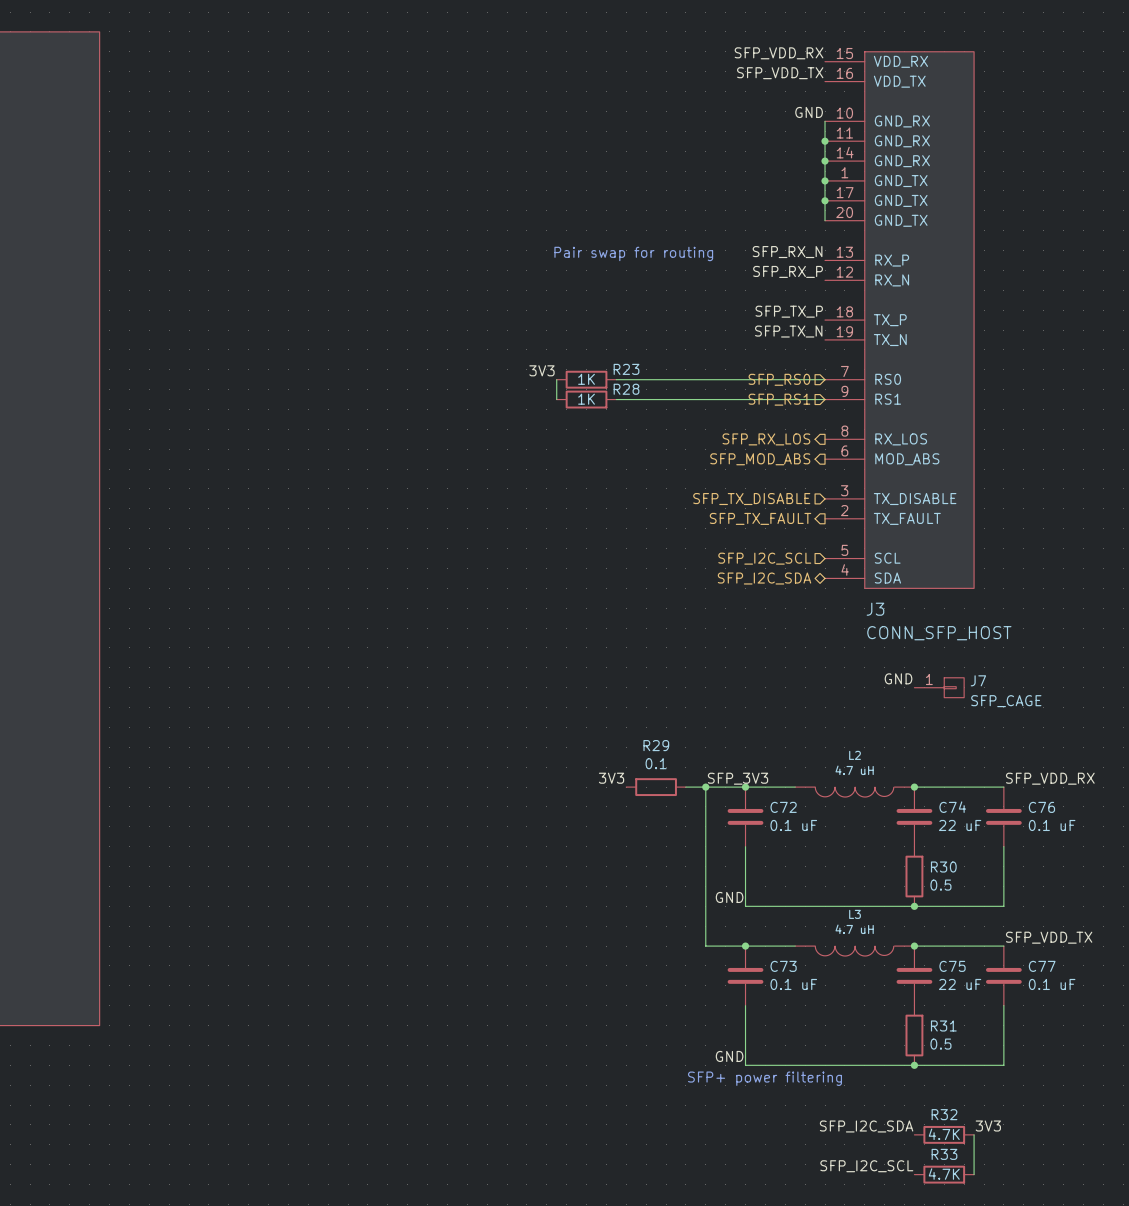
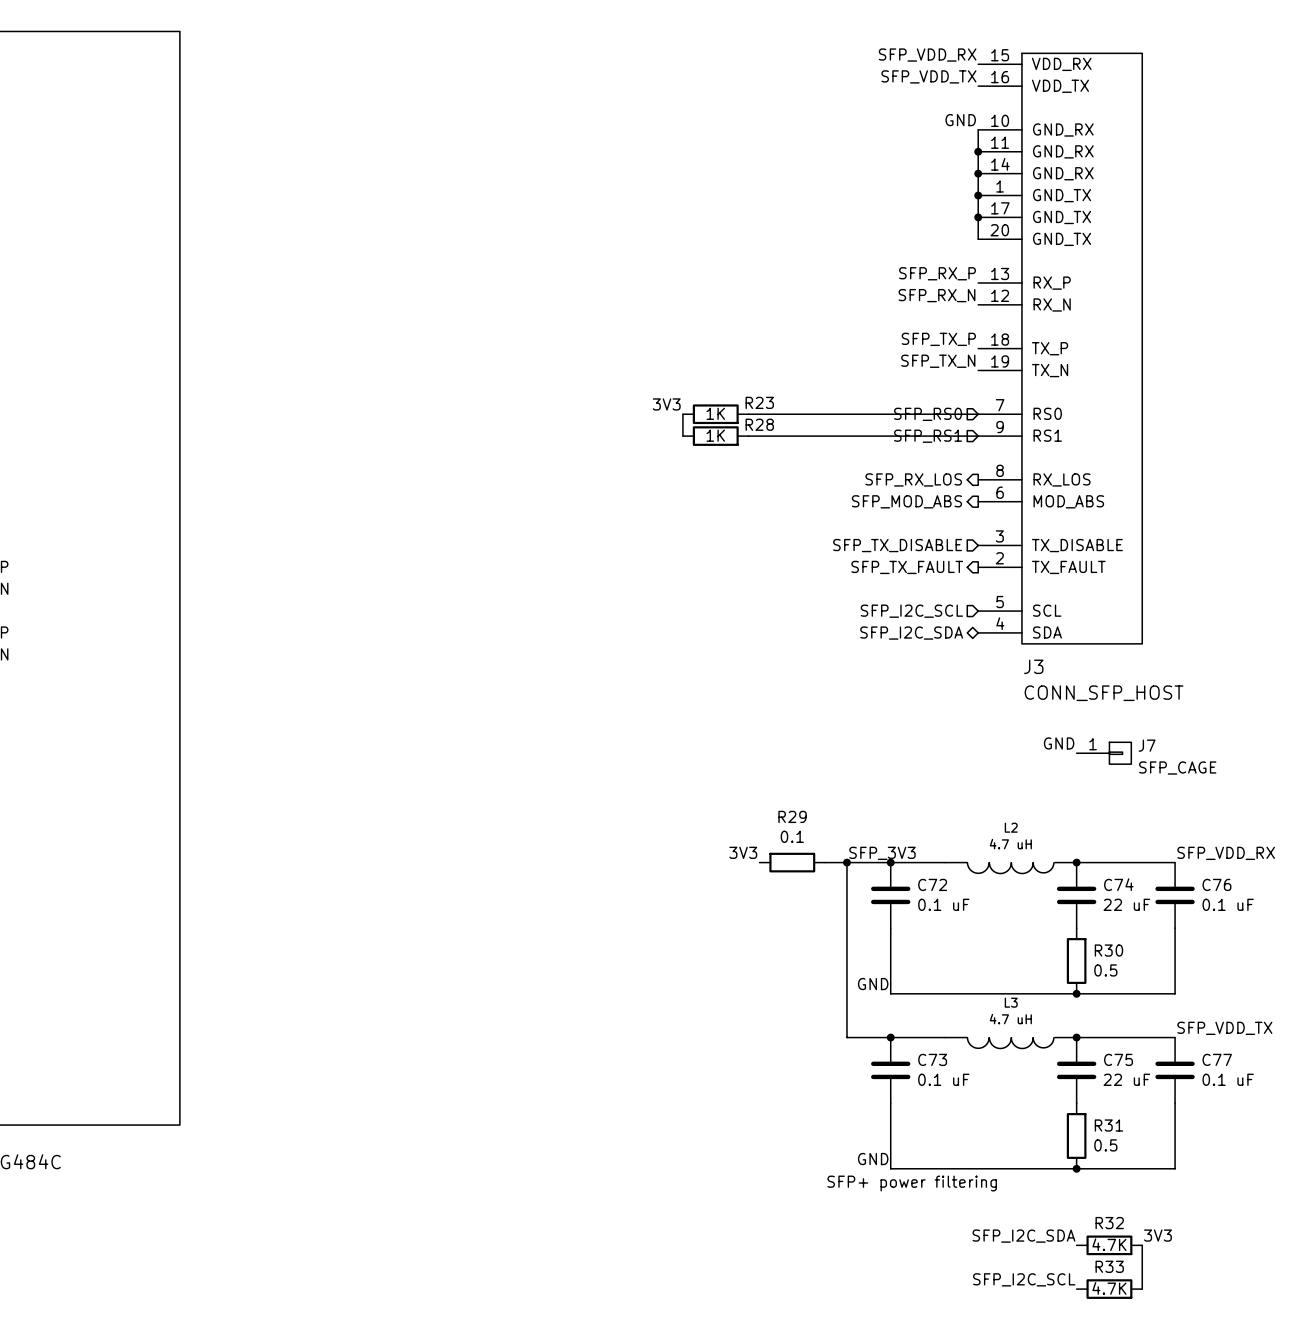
label: SFP_RX_N (787, 252) -> SFP_RX_P (937, 273)
text: Pair swap for routing (633, 253) -> none
label: SFP_RX_P (788, 271) -> SFP_RX_N (936, 295)

